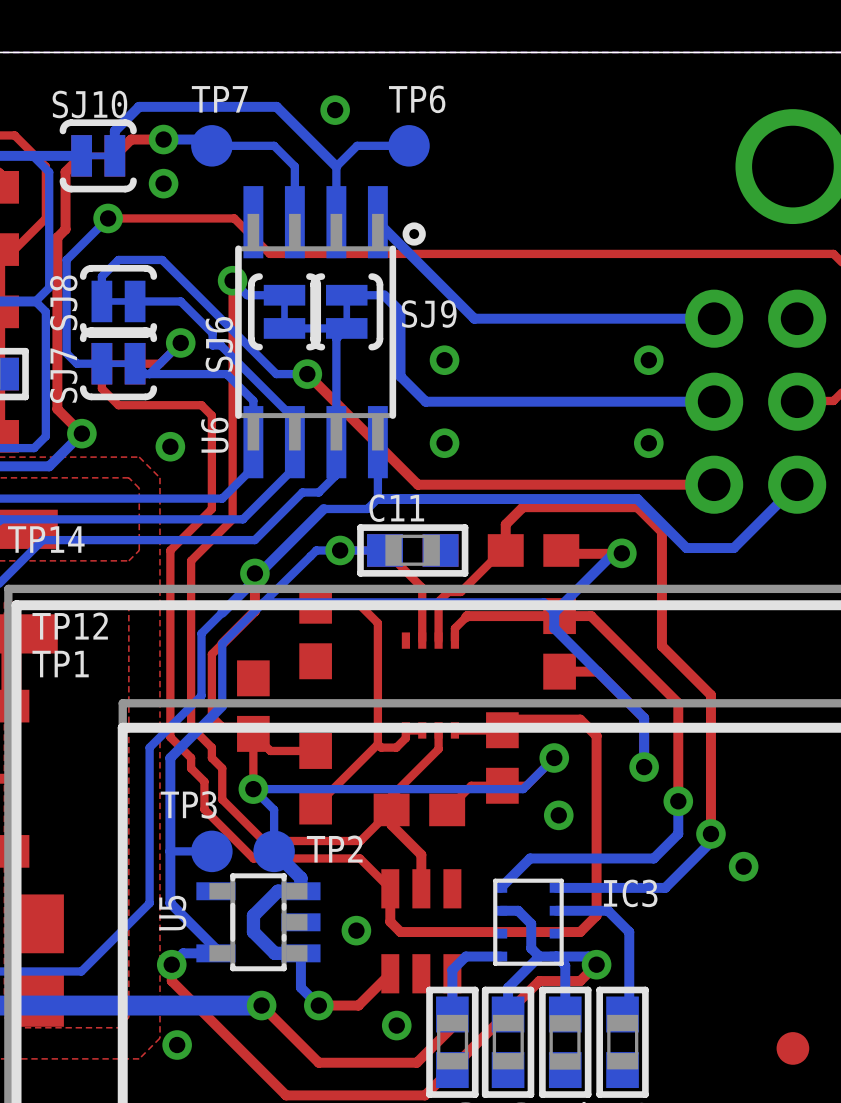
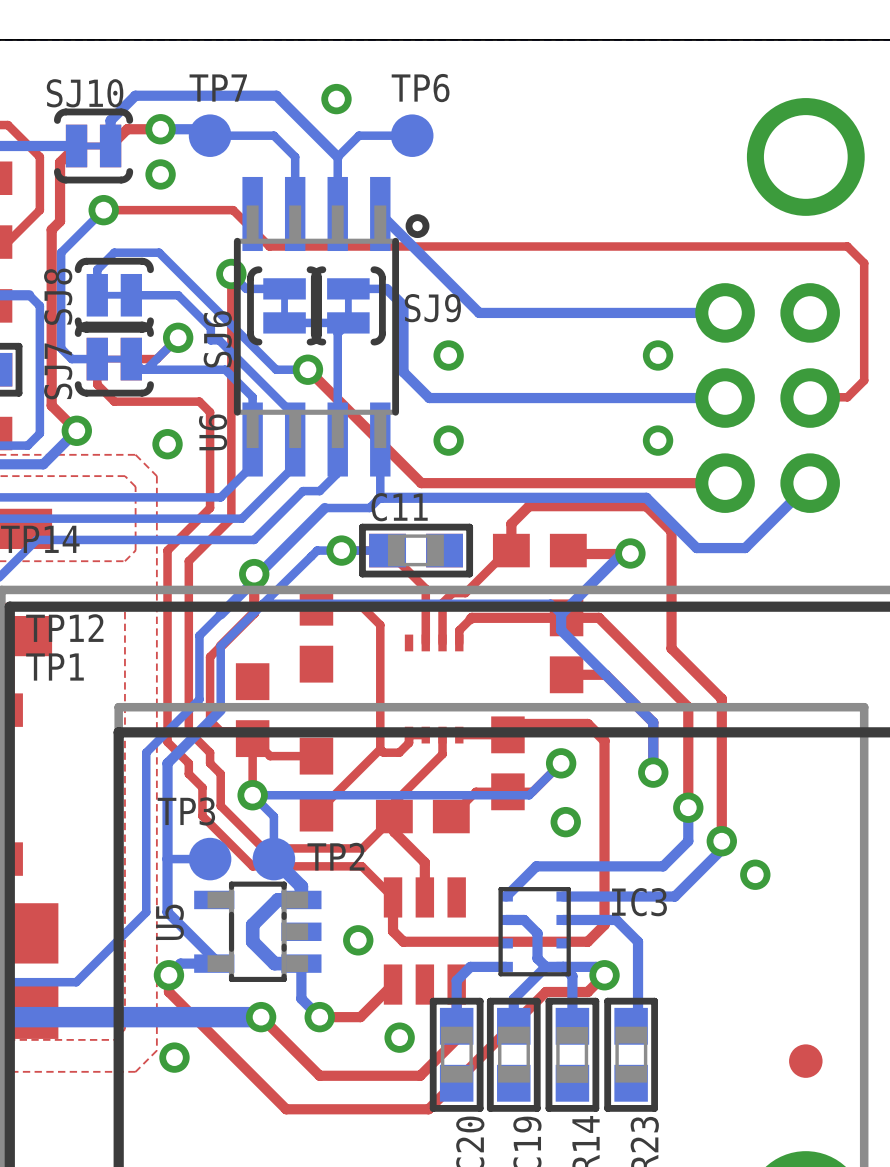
bottom track: (32, 155) (49, 172) (49, 287) (35, 301) -> none

